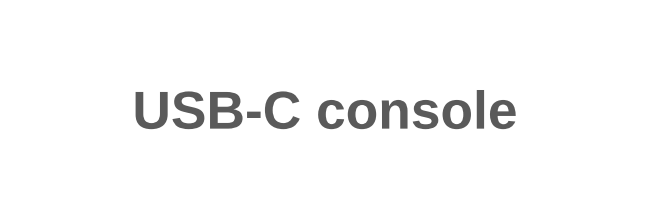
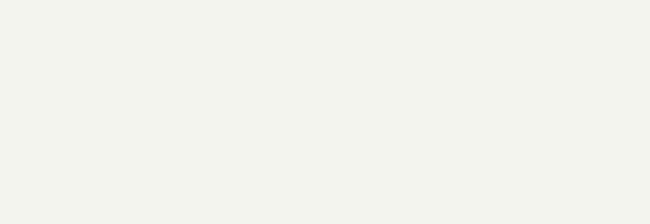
text: USB-C console (325, 109) -> none

